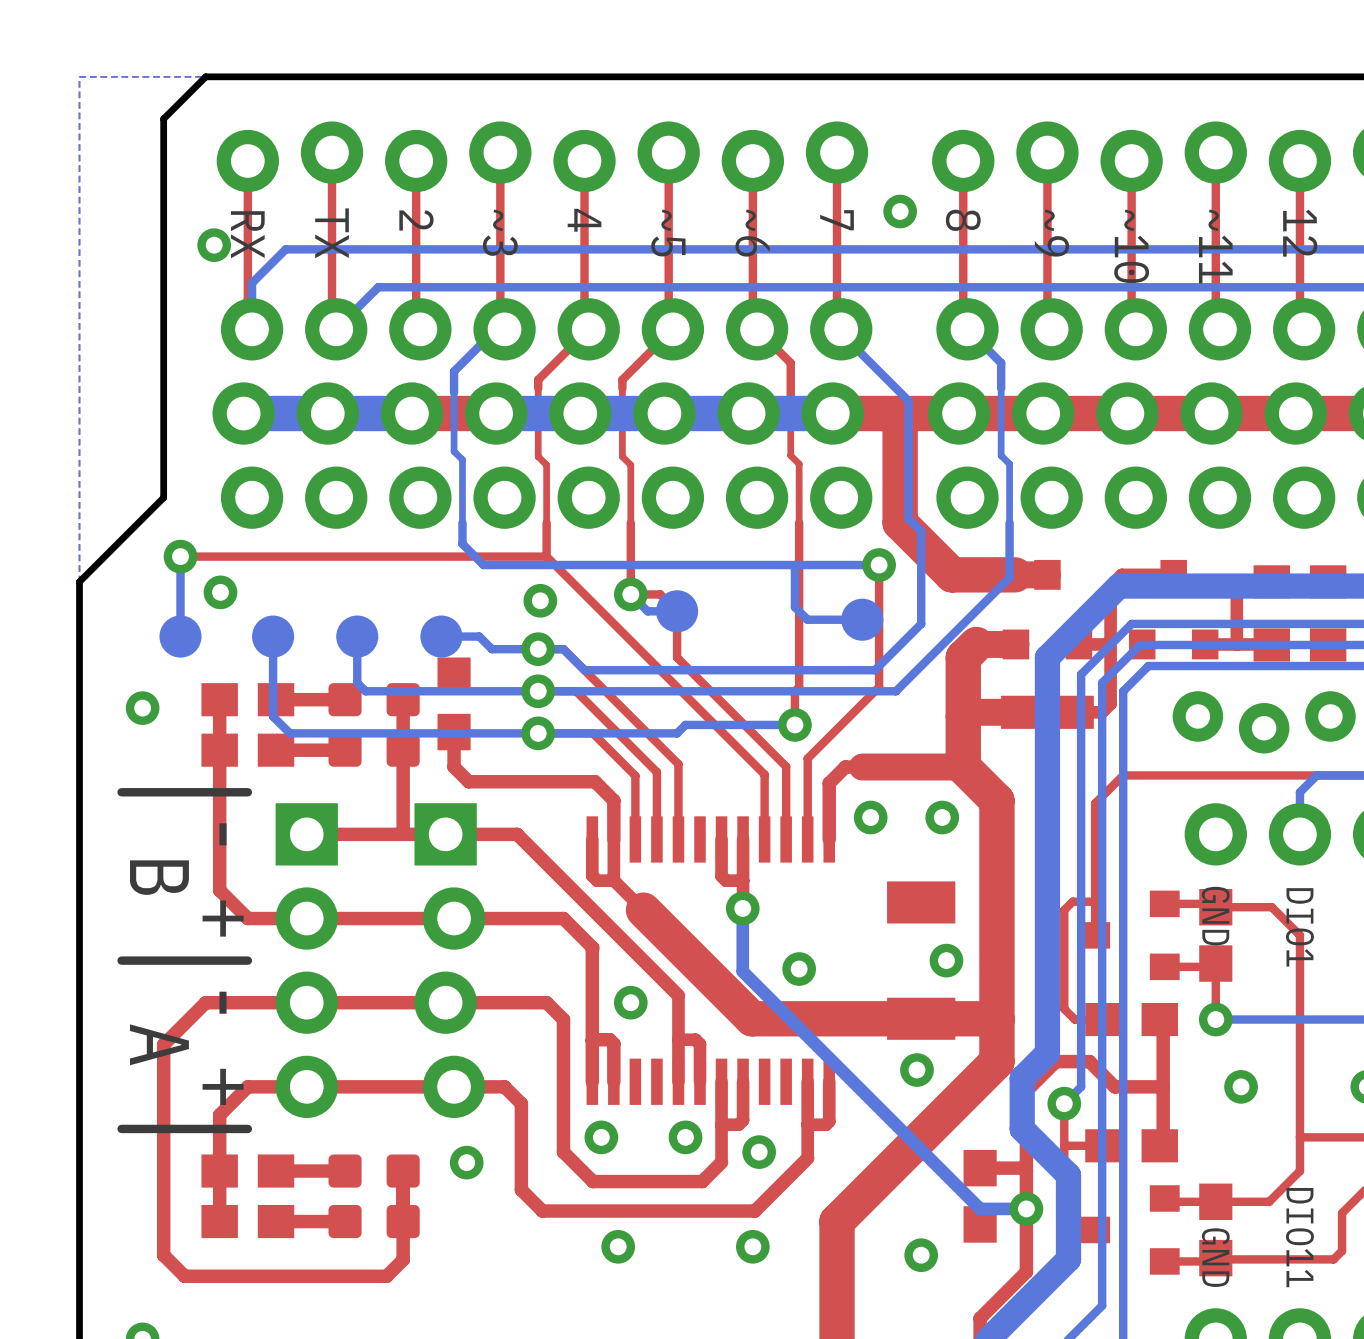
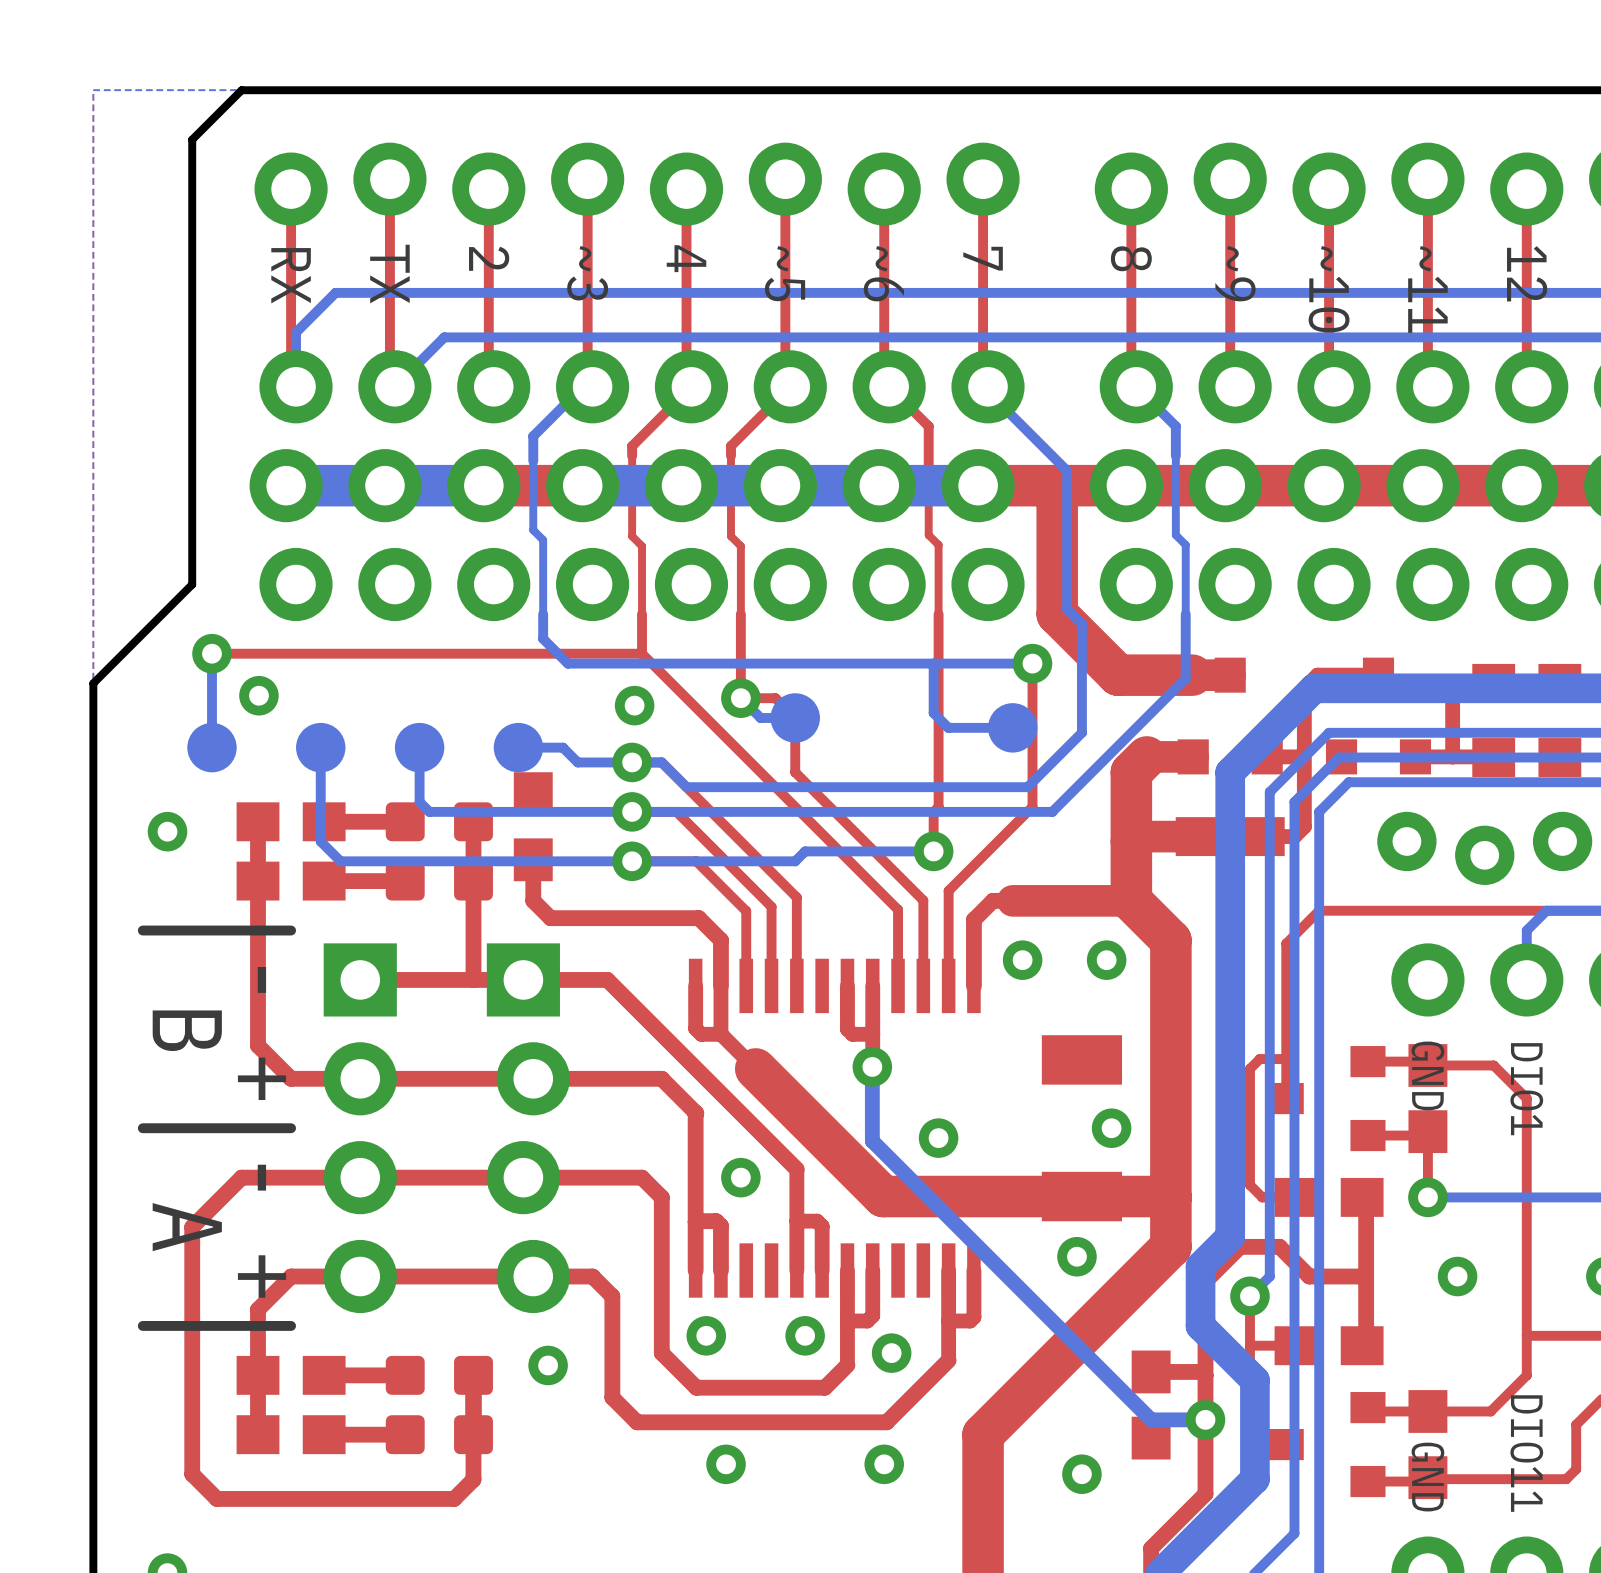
via: (900, 211) -> none
via: (214, 245) -> none

